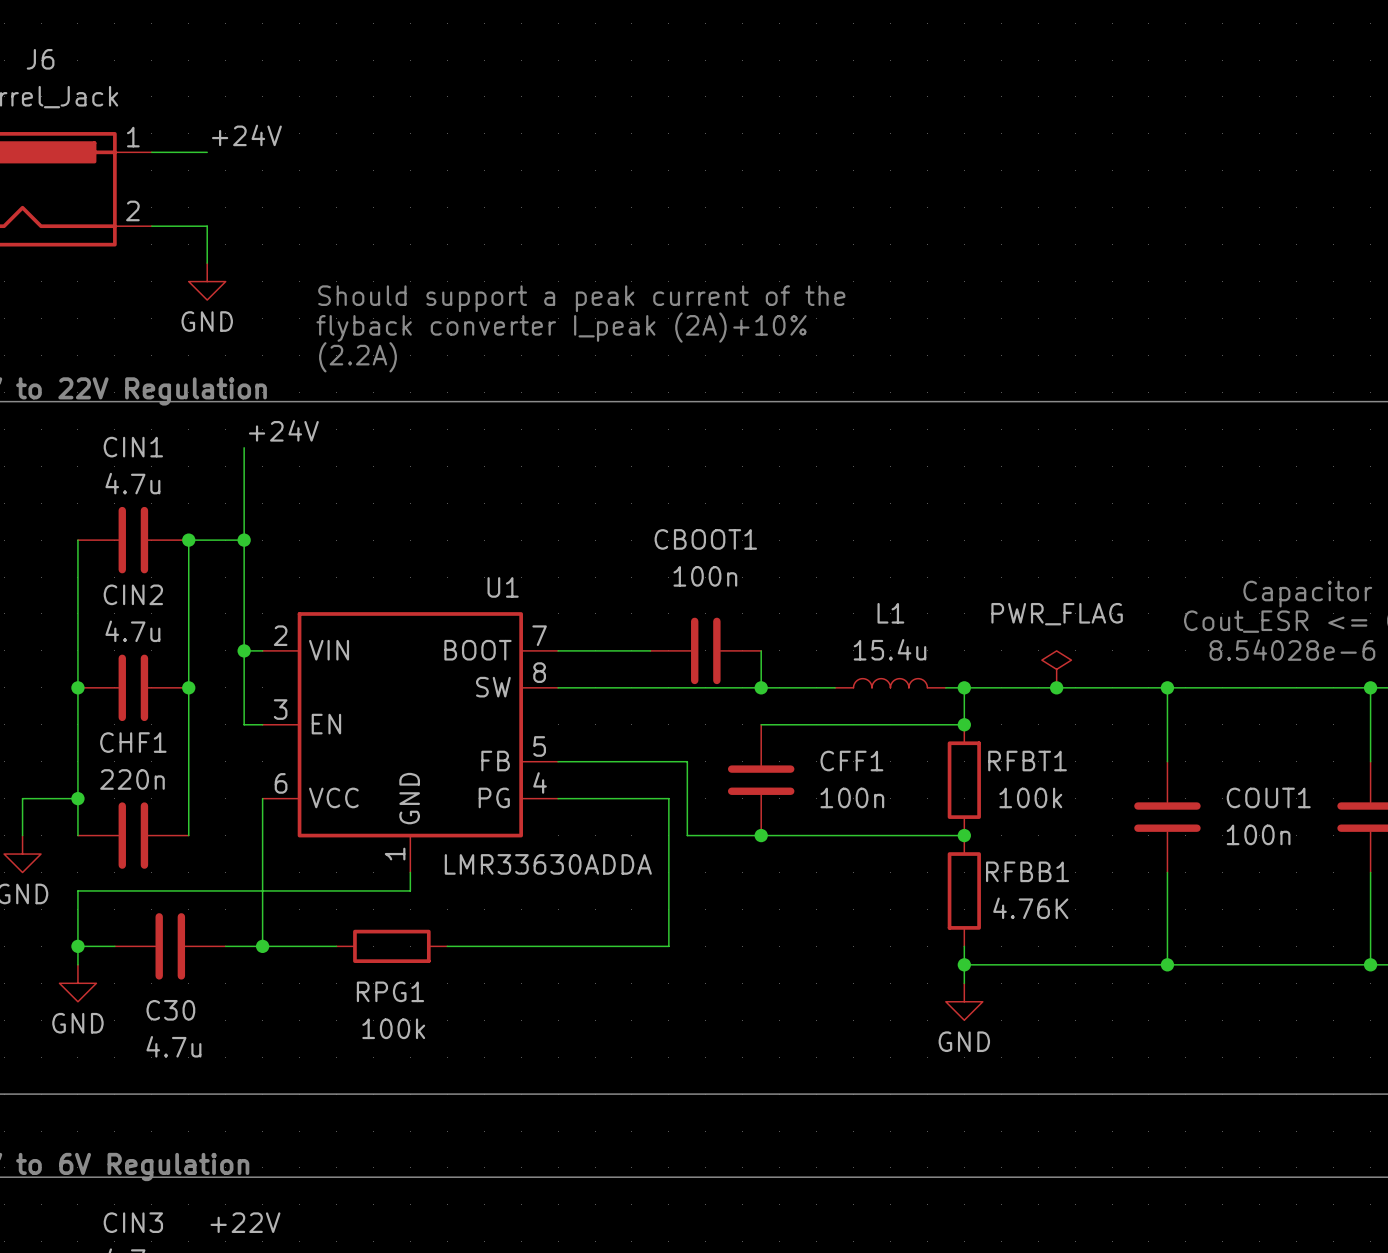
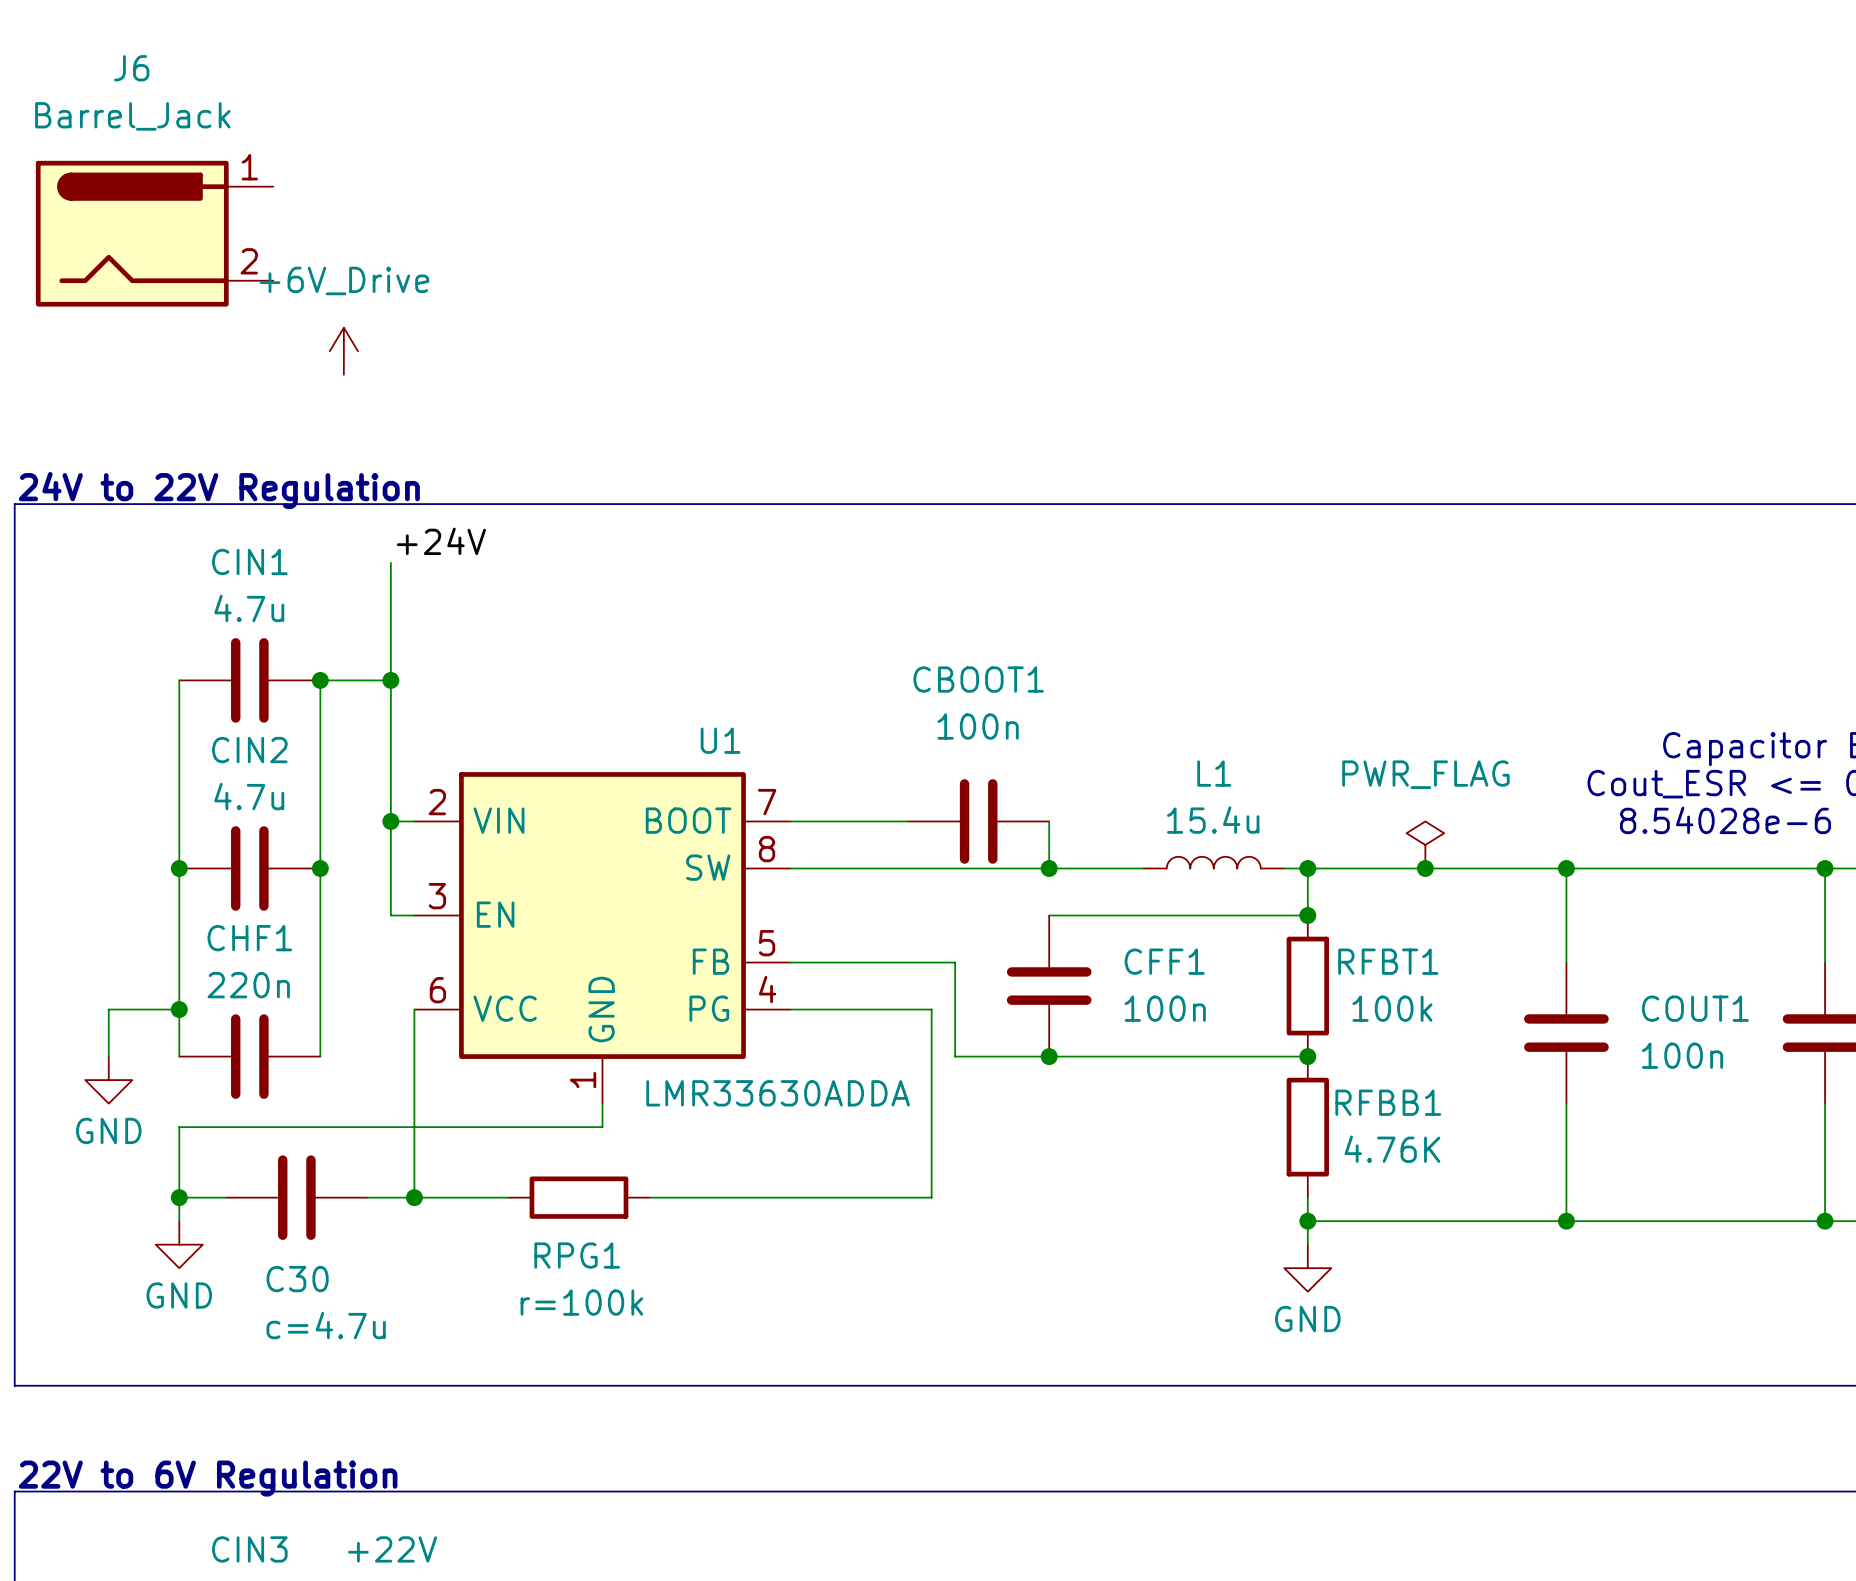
label: +24V (246, 135) -> none
wire: (151, 152) (207, 152) -> none
wire: (151, 226) (207, 226) (207, 263) -> none
power symbol: GND (207, 281) -> +6V_Drive (343, 351)
text: Should support a peak current of the (581, 298) -> none
text: flyback converter I_peak (2A)+10% (561, 327) -> none
text: (2.2A) (357, 357) -> none
RPG1 value: 100k (393, 1028) -> r=100k (581, 1302)
C30 value: 4.7u (173, 1046) -> c=4.7u (326, 1325)

